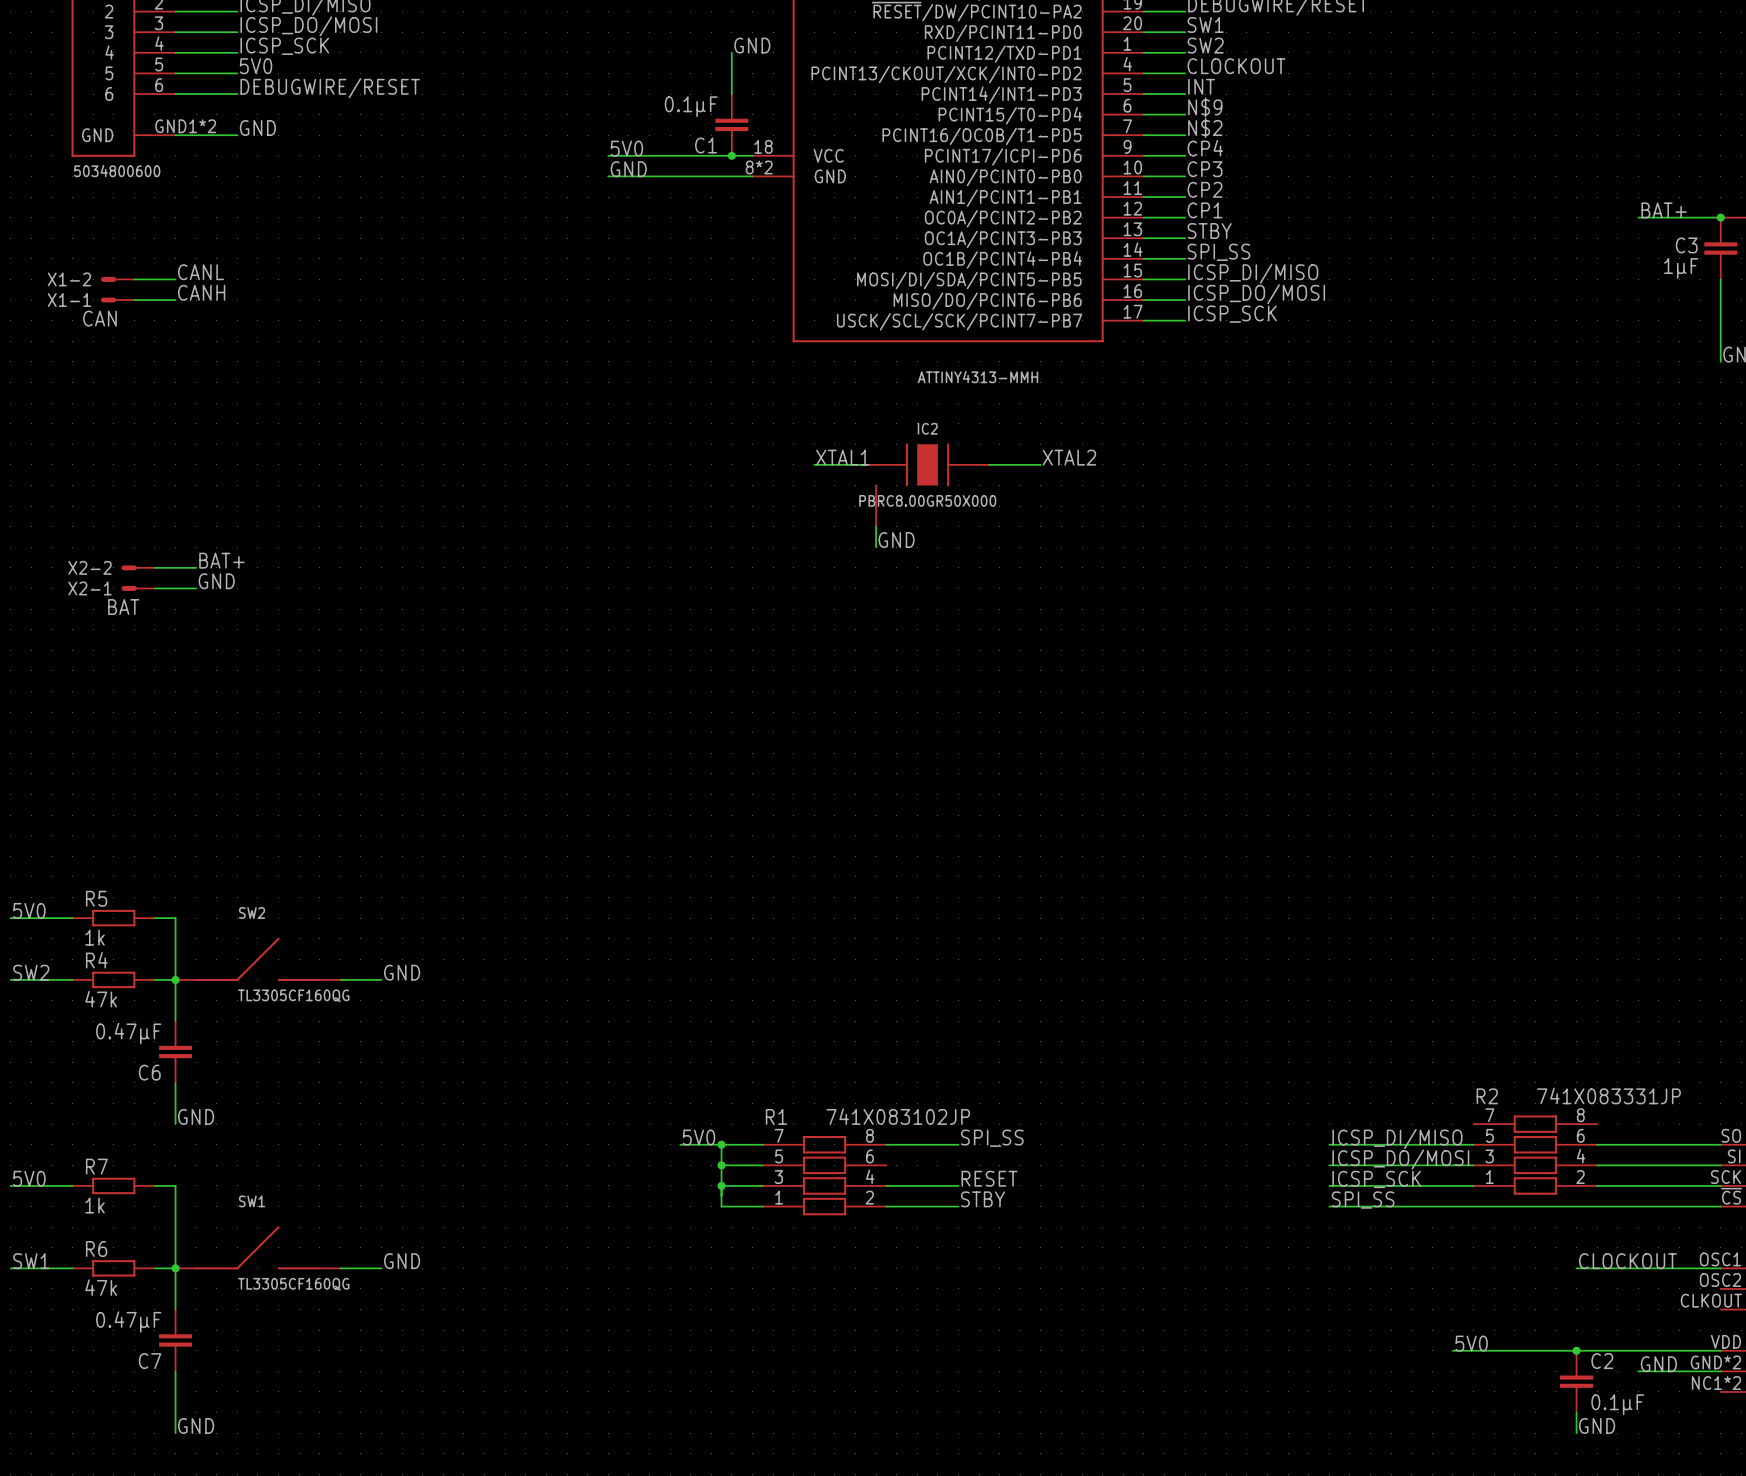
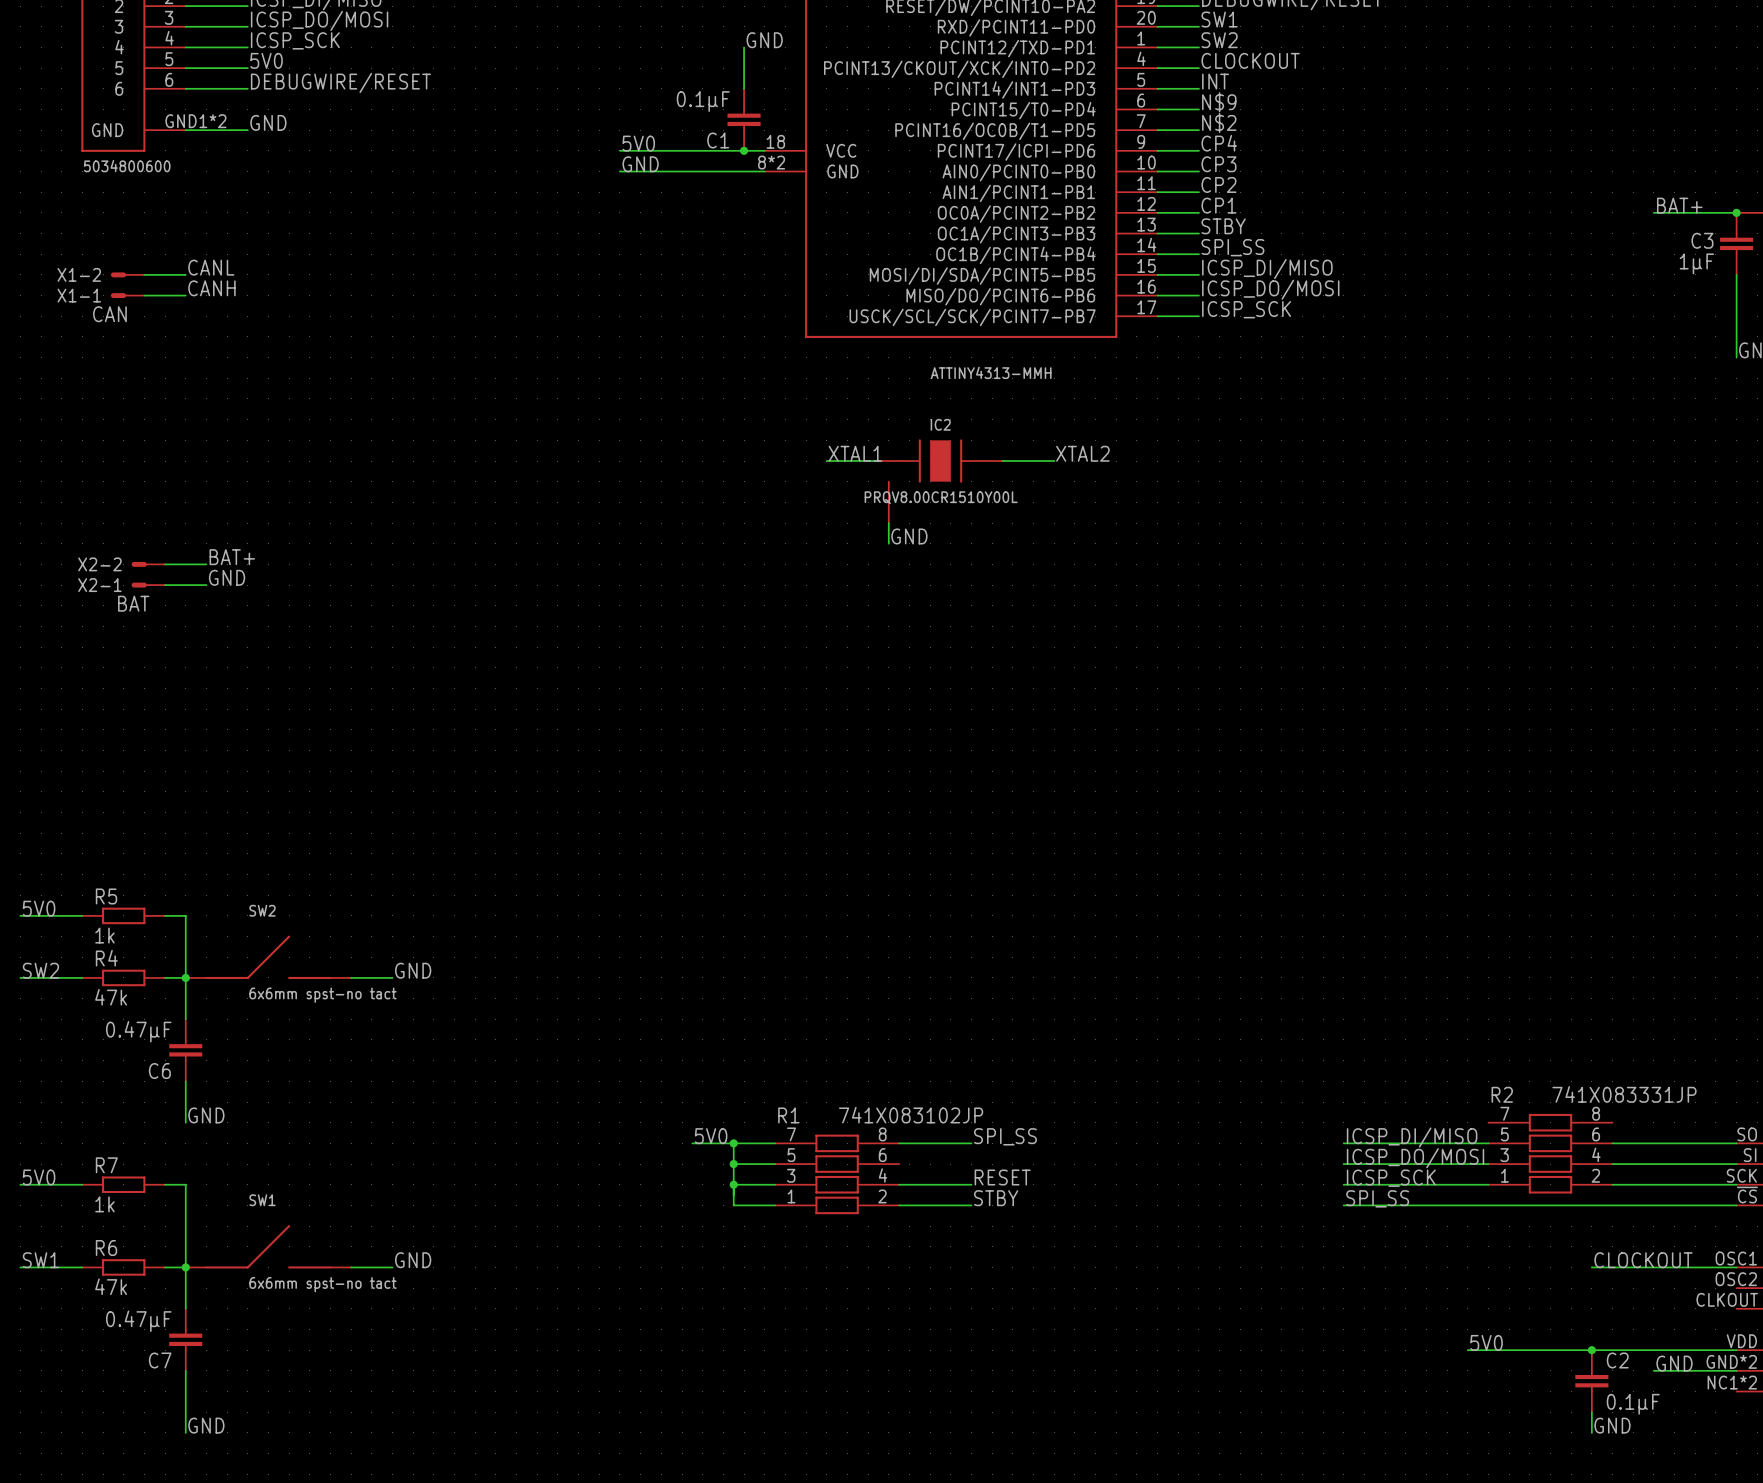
IC2 value: PBRC8.00GR50X000 (927, 500) -> PRQV8.00CR1510Y00L (941, 497)
SW2 value: TL3305CF160QG (293, 995) -> 6x6mm spst-no tact (322, 995)
SW1 value: TL3305CF160QG (293, 1284) -> 6x6mm spst-no tact (322, 1284)

